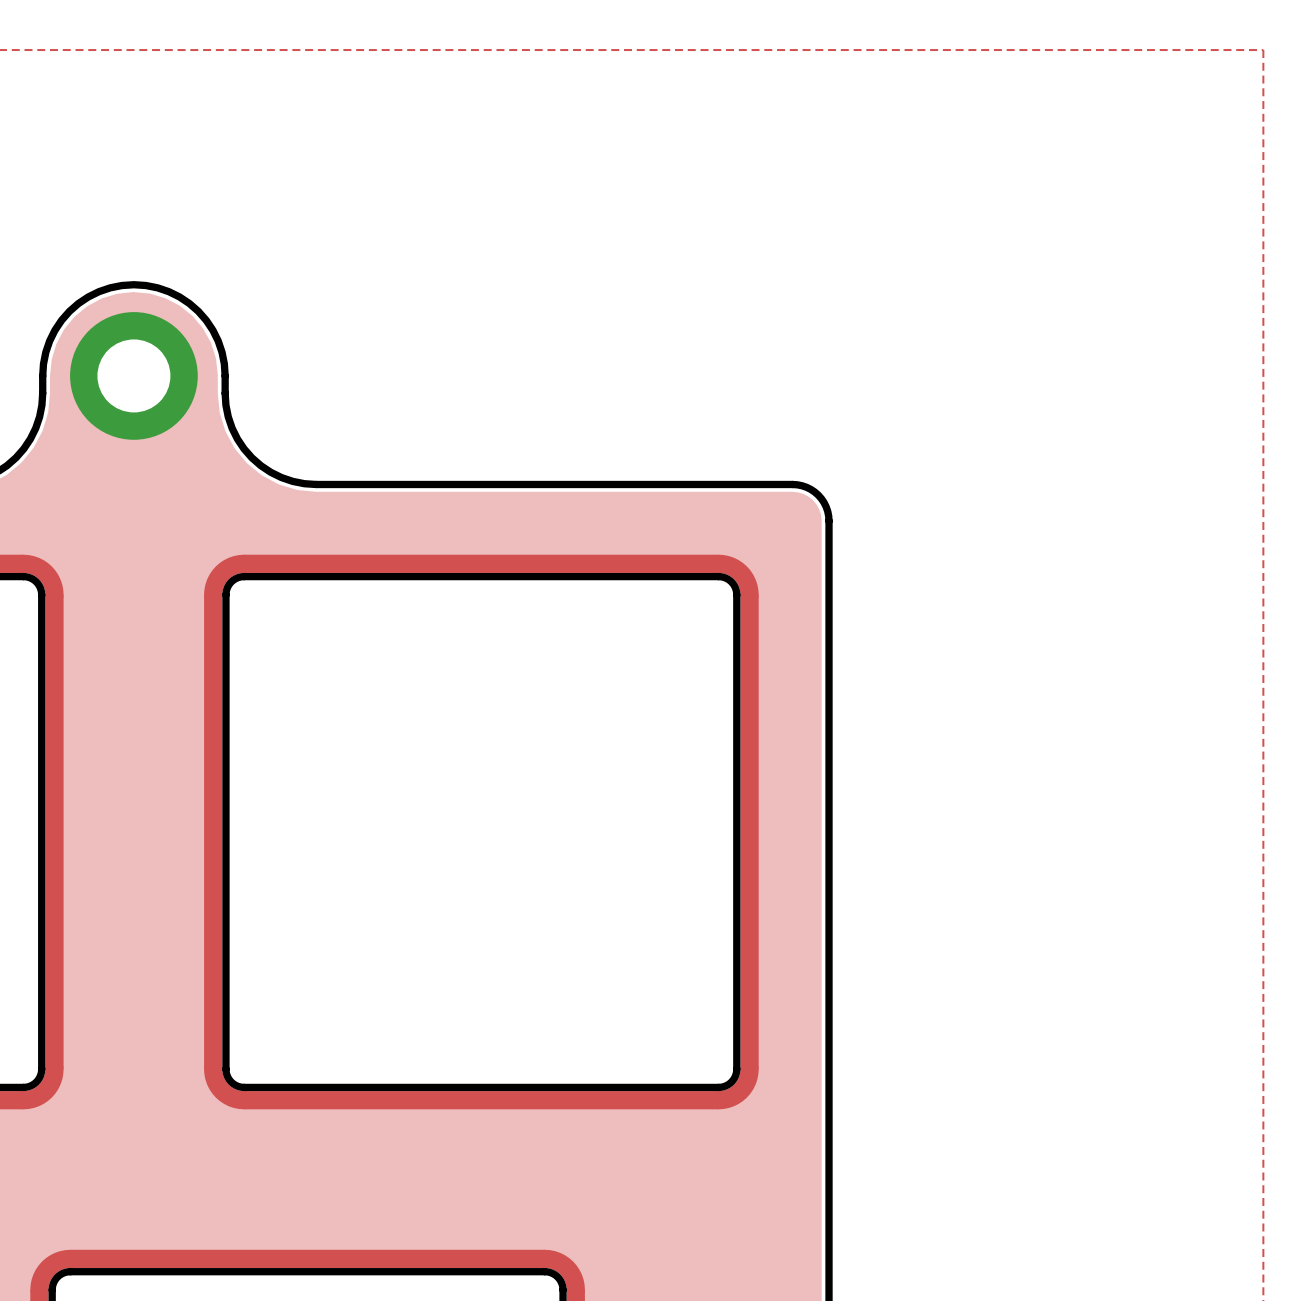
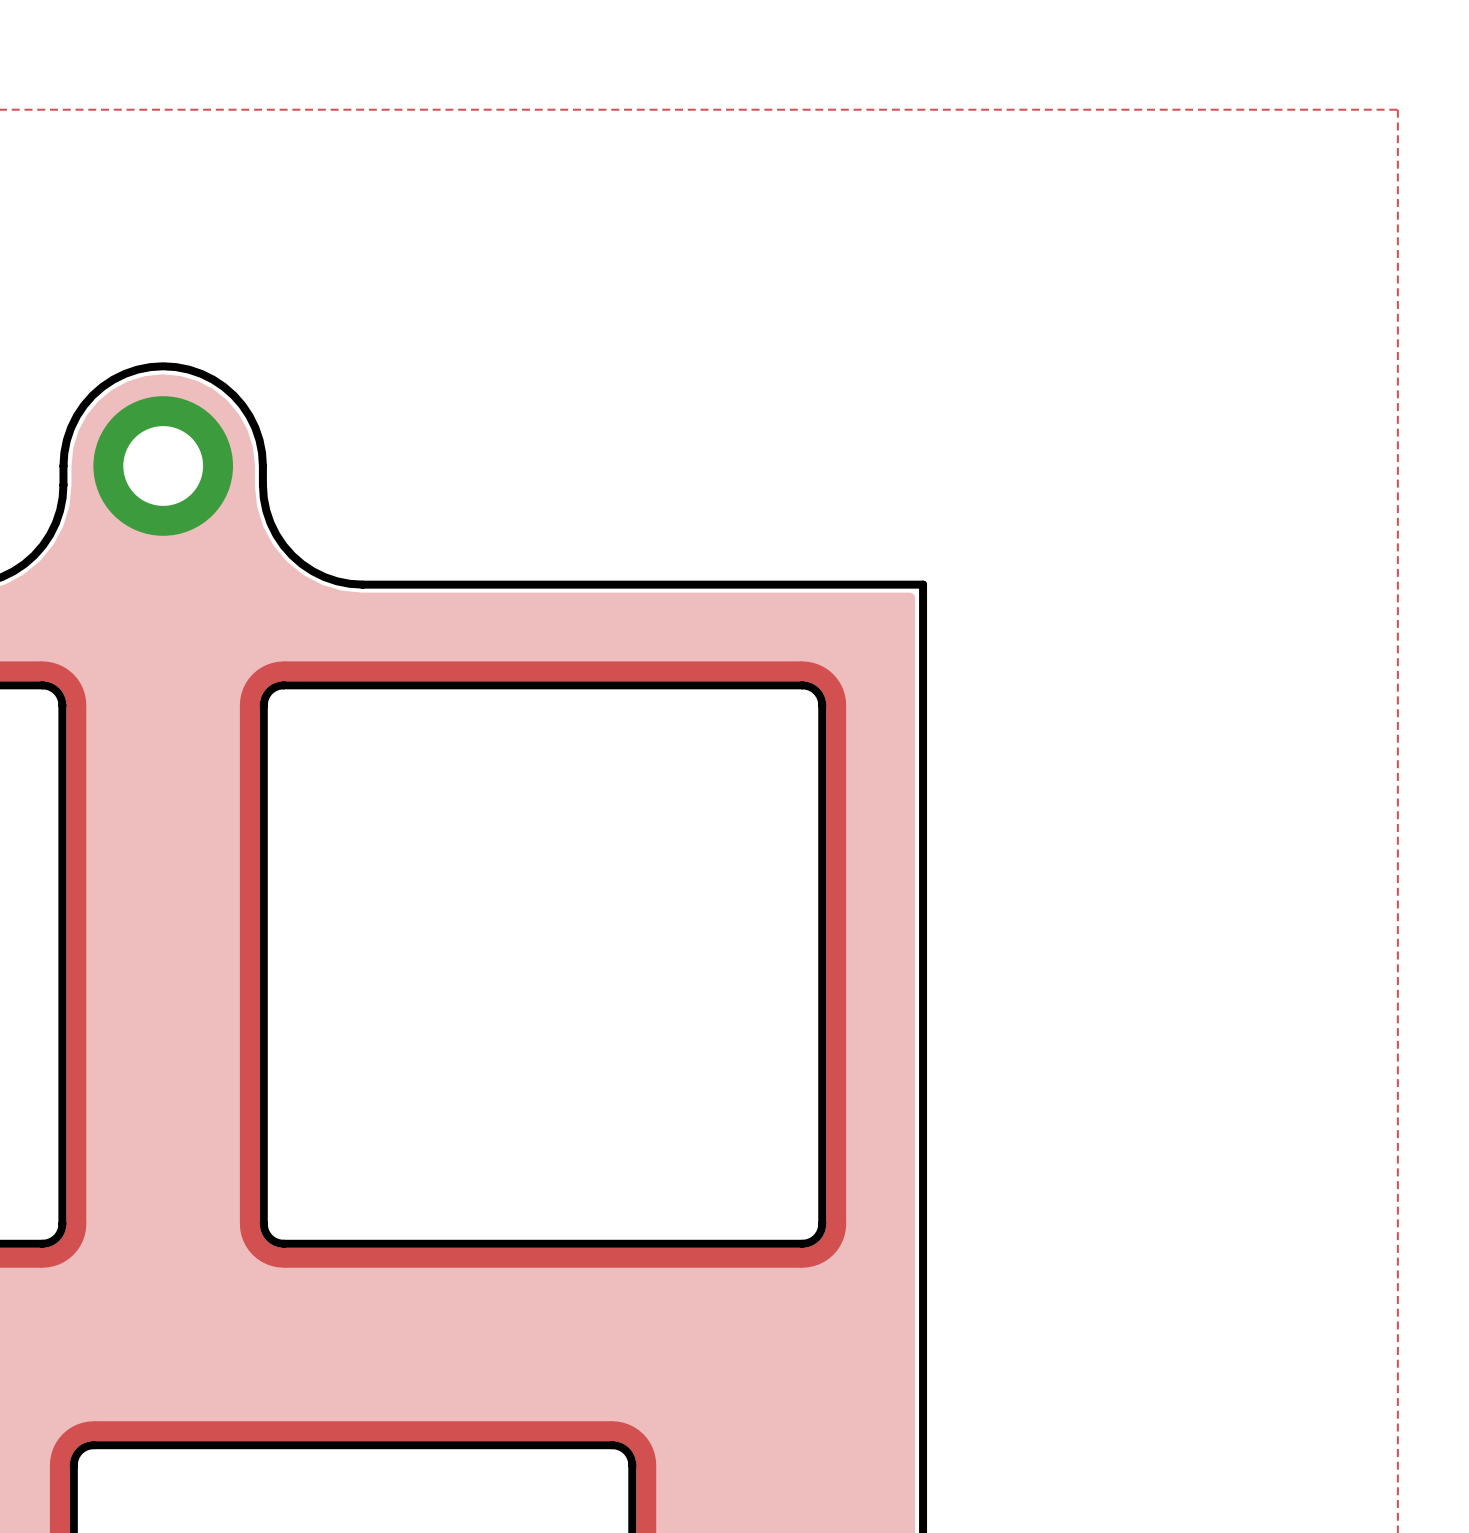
board edge: (792, 484) (806, 487) (818, 495) (826, 507) (829, 520) -> (883, 584) (923, 584) (923, 624)

